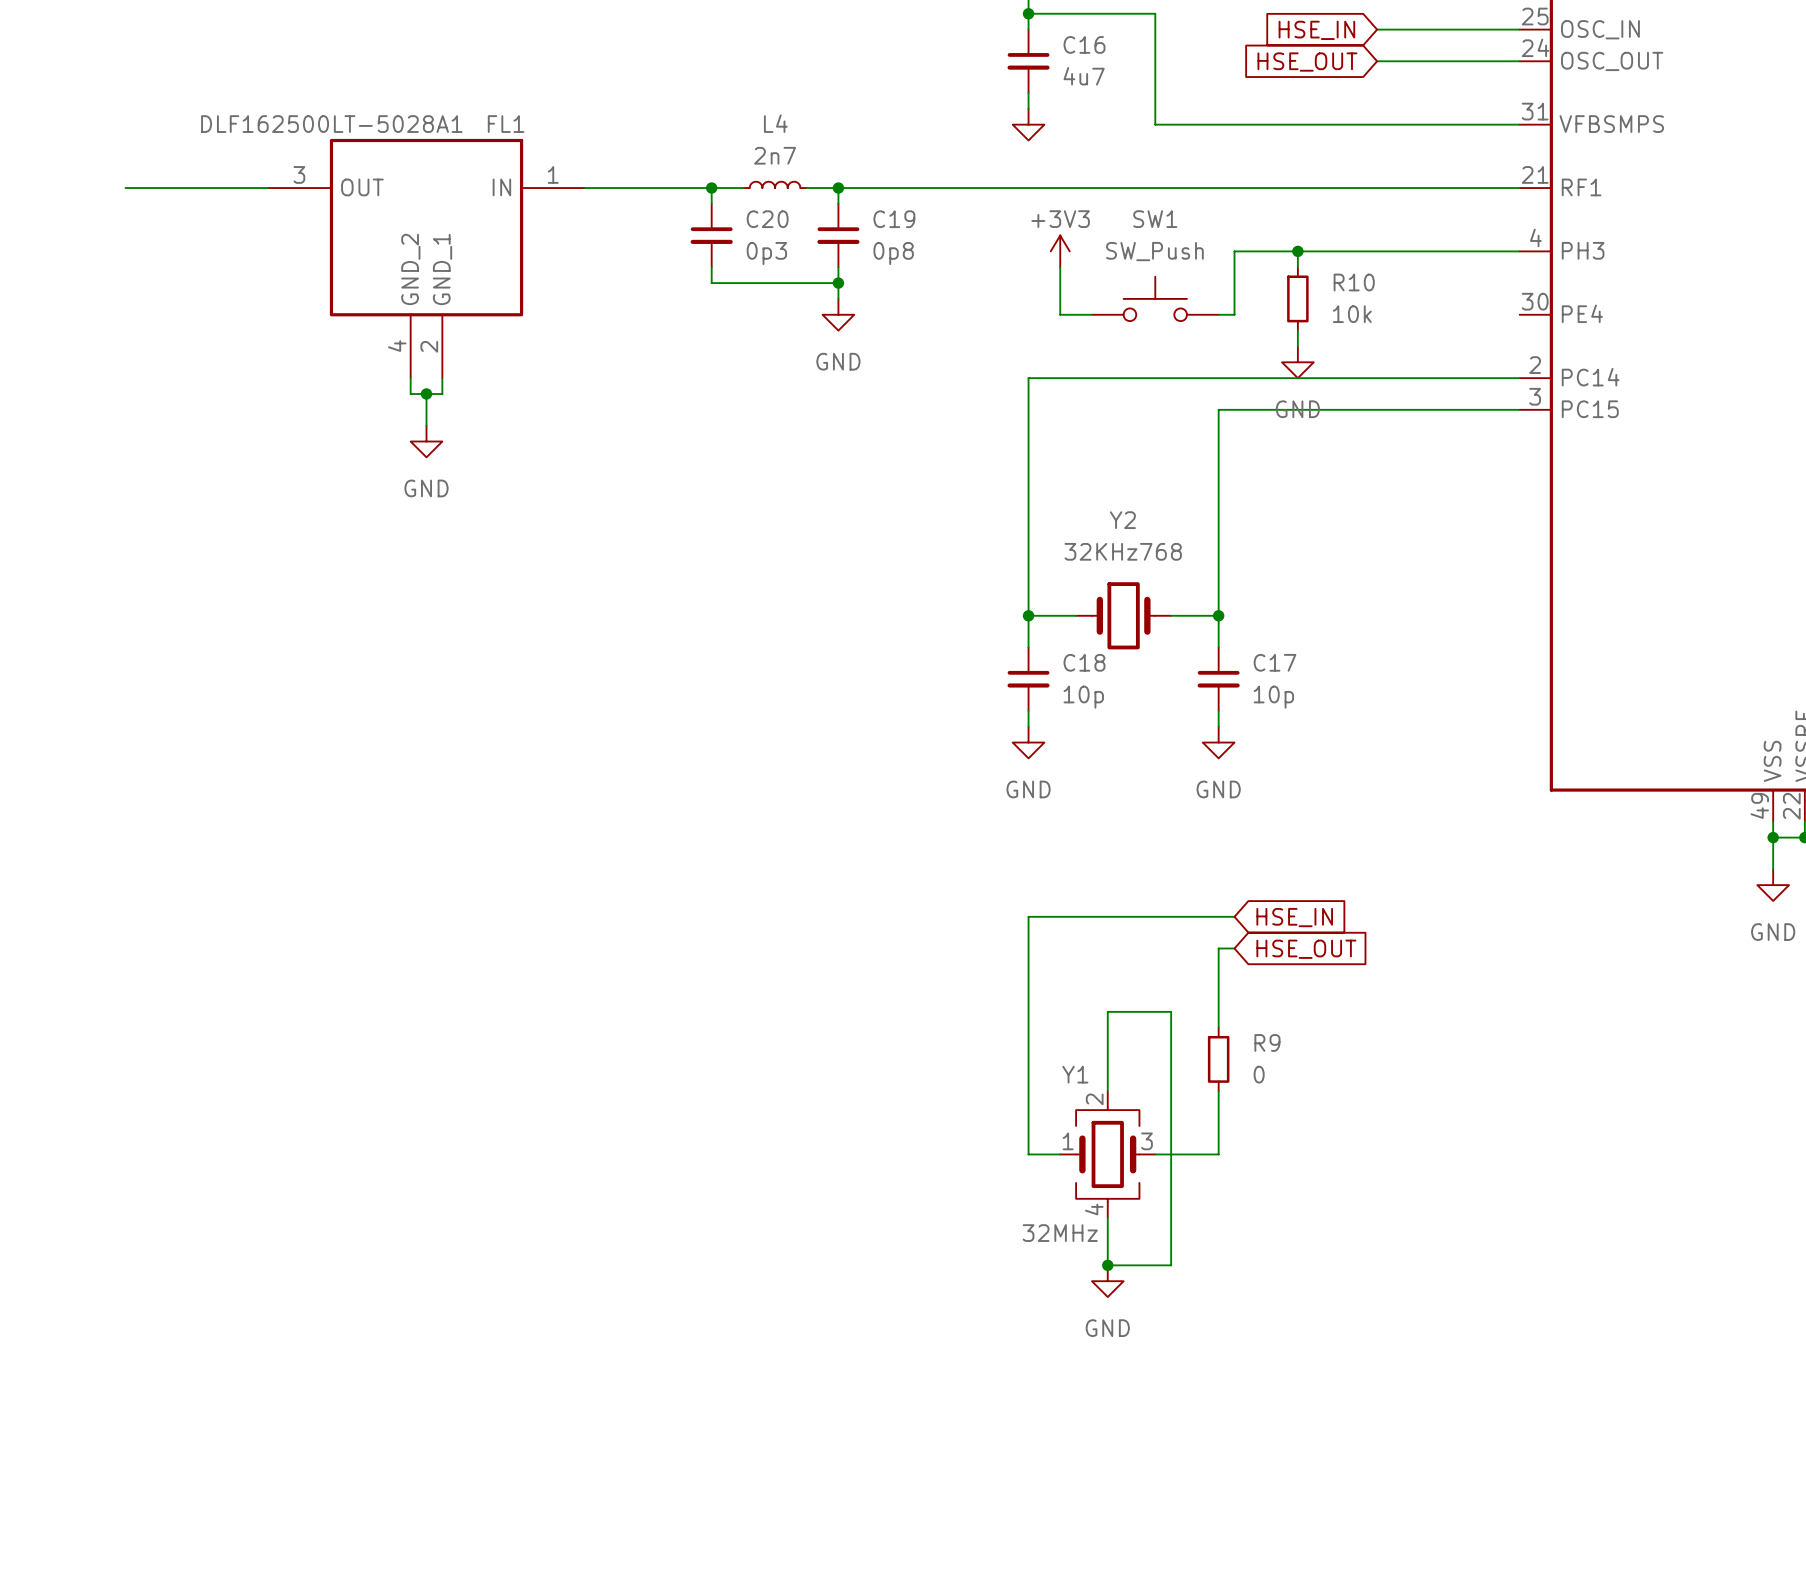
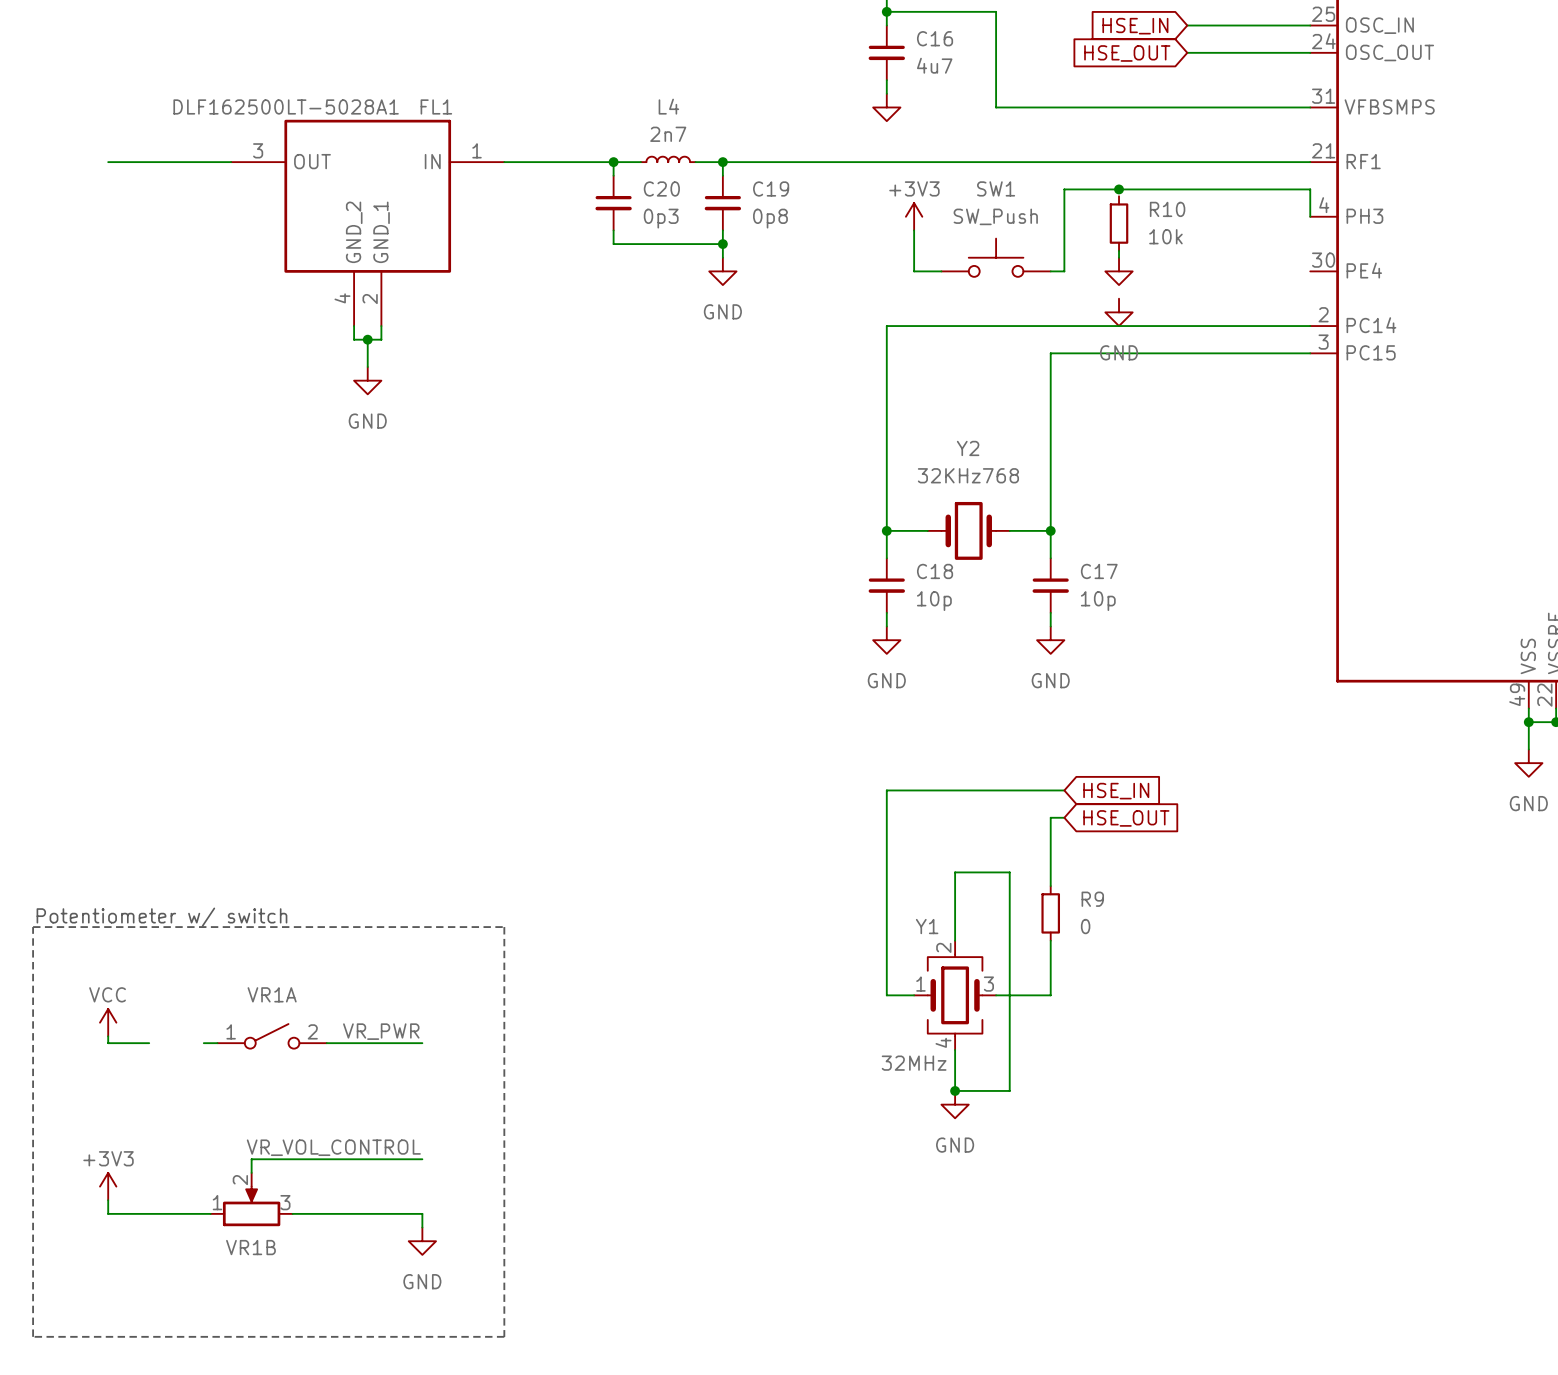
wire: (1234, 251) (1519, 251) -> (1064, 216) (1064, 189) (1310, 189) (1310, 216)
wire: (1297, 251) (1297, 267) -> none
junction position: (1297, 251) -> (1119, 189)
wire: none -> (1119, 250) (1119, 257)
R10 position: (1297, 298) -> (1119, 223)
power symbol: none -> (1119, 271)
wire: (1297, 330) (1297, 346) -> none
text: none -> Potentiometer w/ switch (161, 917)
line: none -> (33, 927) (504, 927) (504, 1336) (33, 1336) (33, 927)
power symbol: none -> VCC (108, 1022)
label: none -> VR_PWR (381, 1031)
wire: none -> (108, 1036) (108, 1043) (149, 1043)
VR1A: none -> (272, 1036)
wire: none -> (203, 1043) (217, 1043)
wire: none -> (326, 1043) (422, 1043)
label: none -> VR_VOL_CONTROL (333, 1147)
wire: none -> (422, 1159) (251, 1159) (251, 1172)
power symbol: none -> +3V3 (108, 1186)
VR1B: none -> (251, 1199)
wire: none -> (108, 1200) (108, 1213) (210, 1213)
wire: none -> (292, 1213) (422, 1213) (422, 1227)
power symbol: none -> GND (422, 1241)

